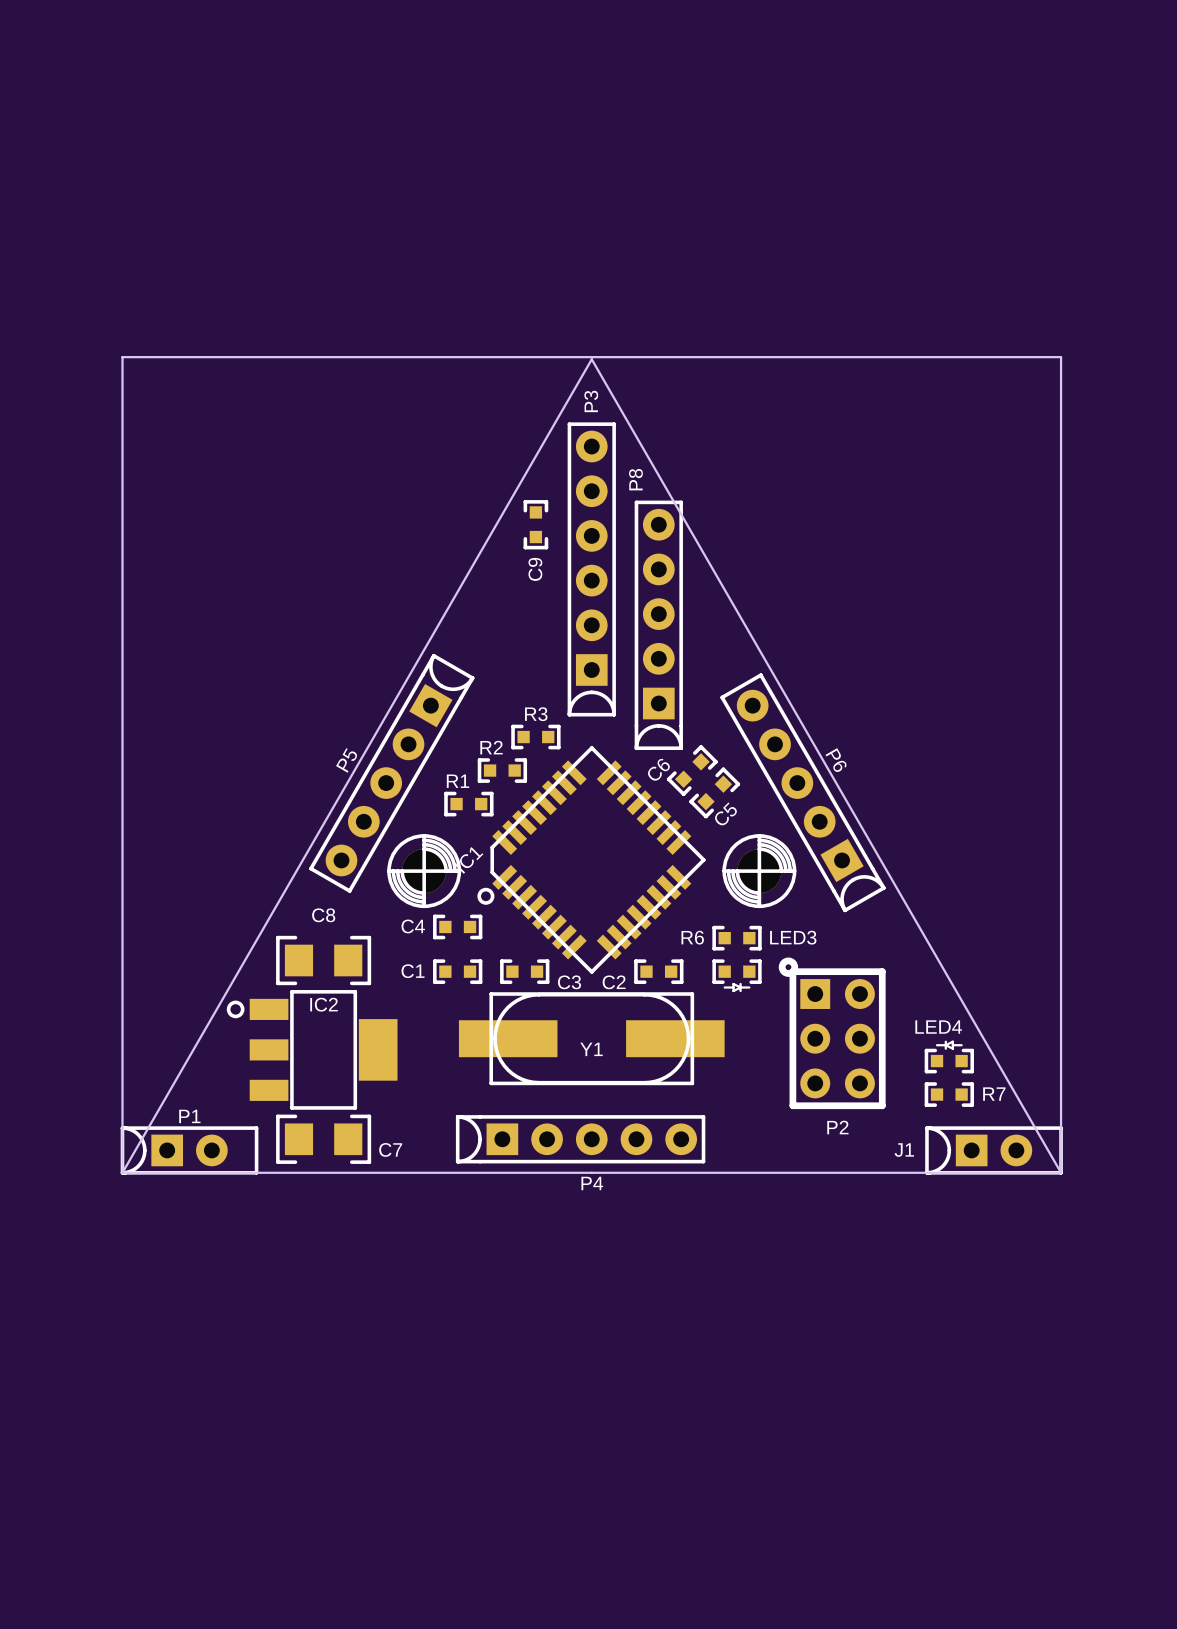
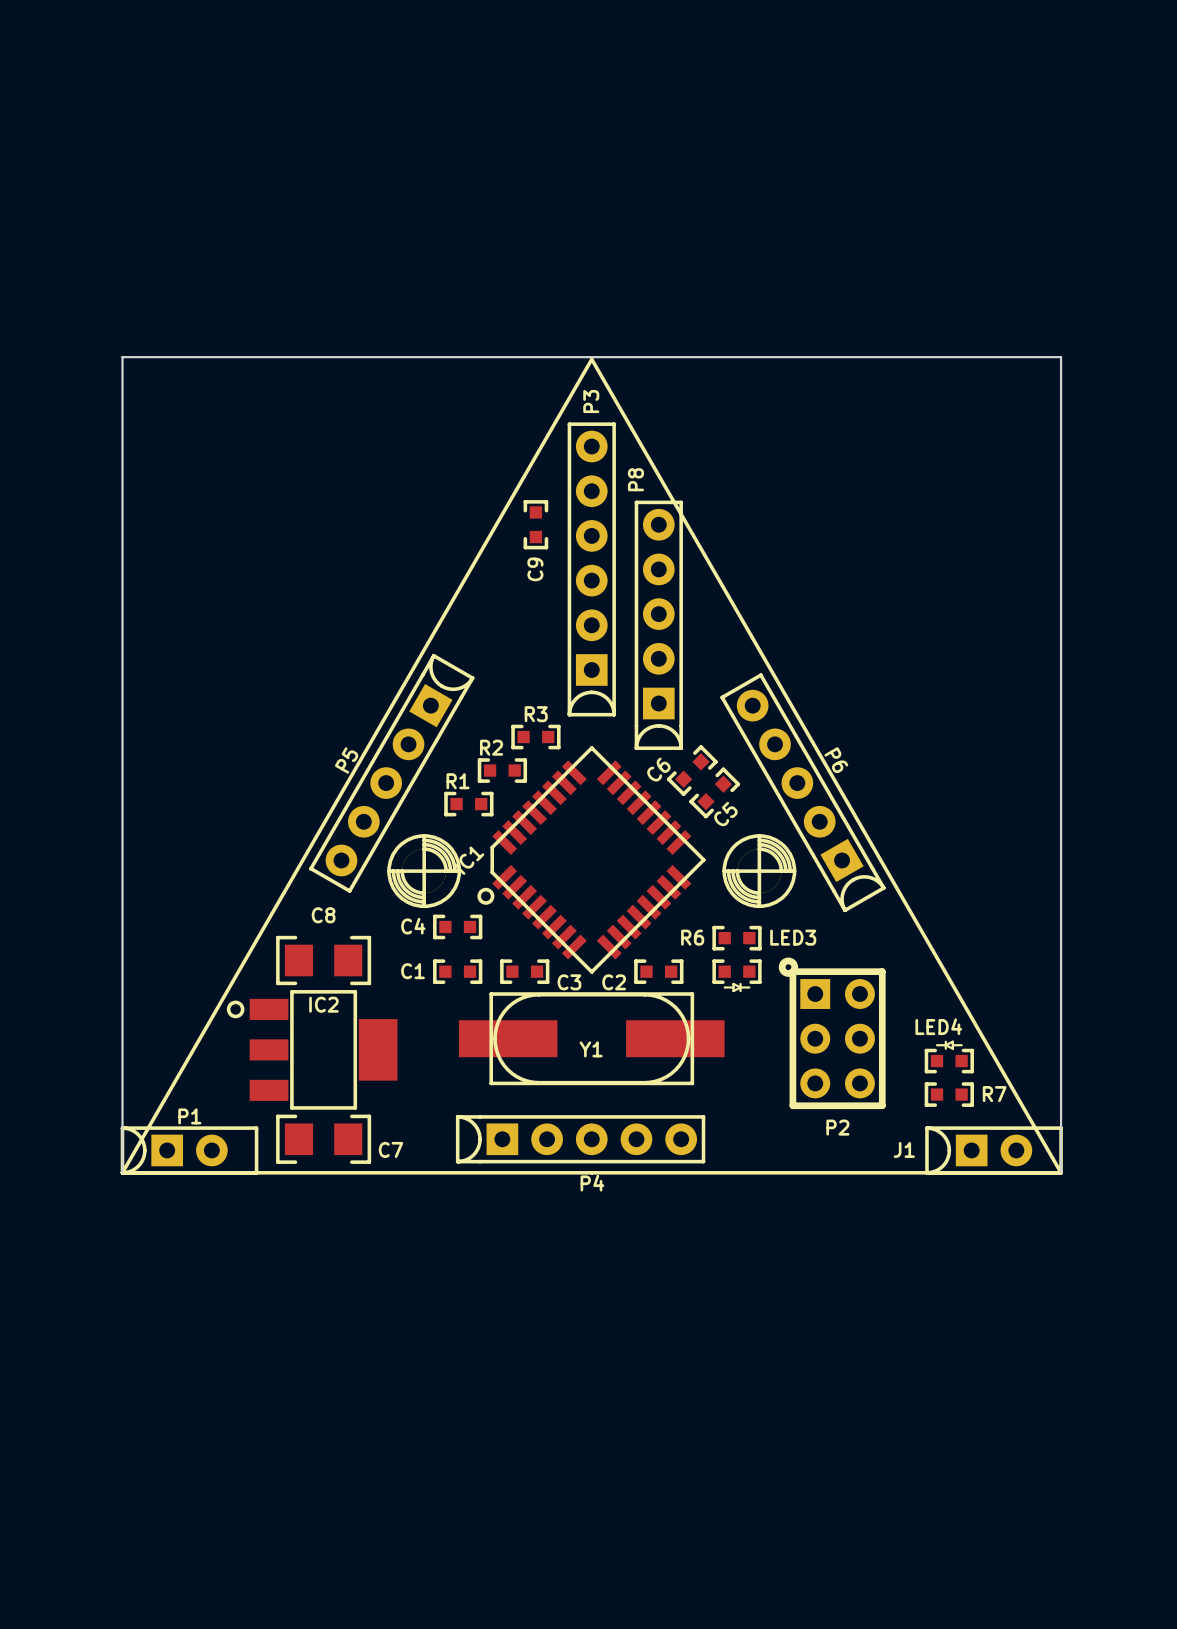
board edge: (591, 359) (122, 1172) (1061, 1172) (591, 359) -> none
line: none -> (591, 359) (122, 1172) (1061, 1172) (591, 359)

